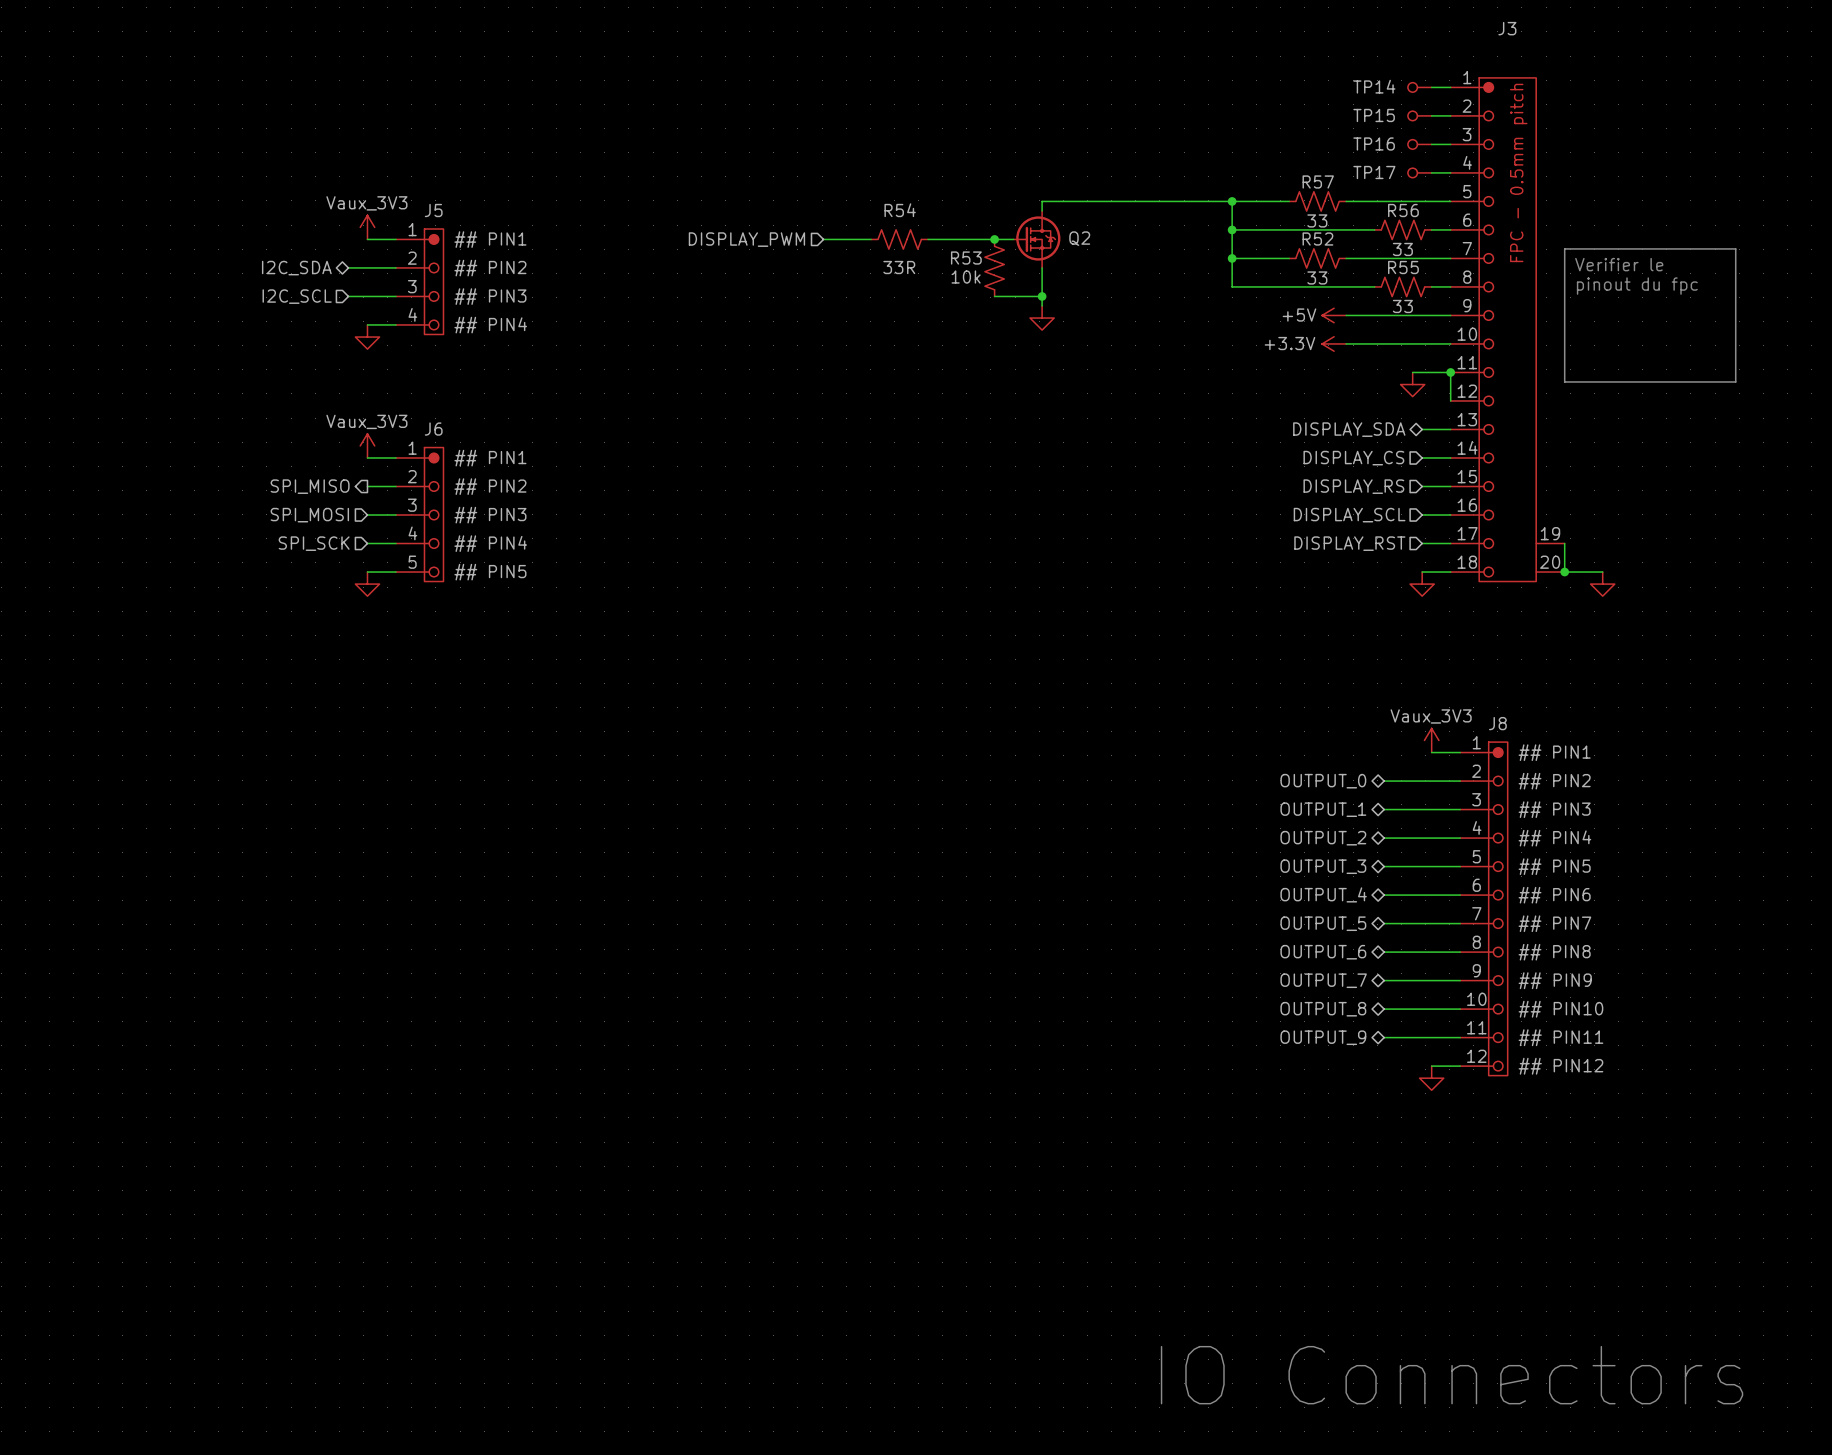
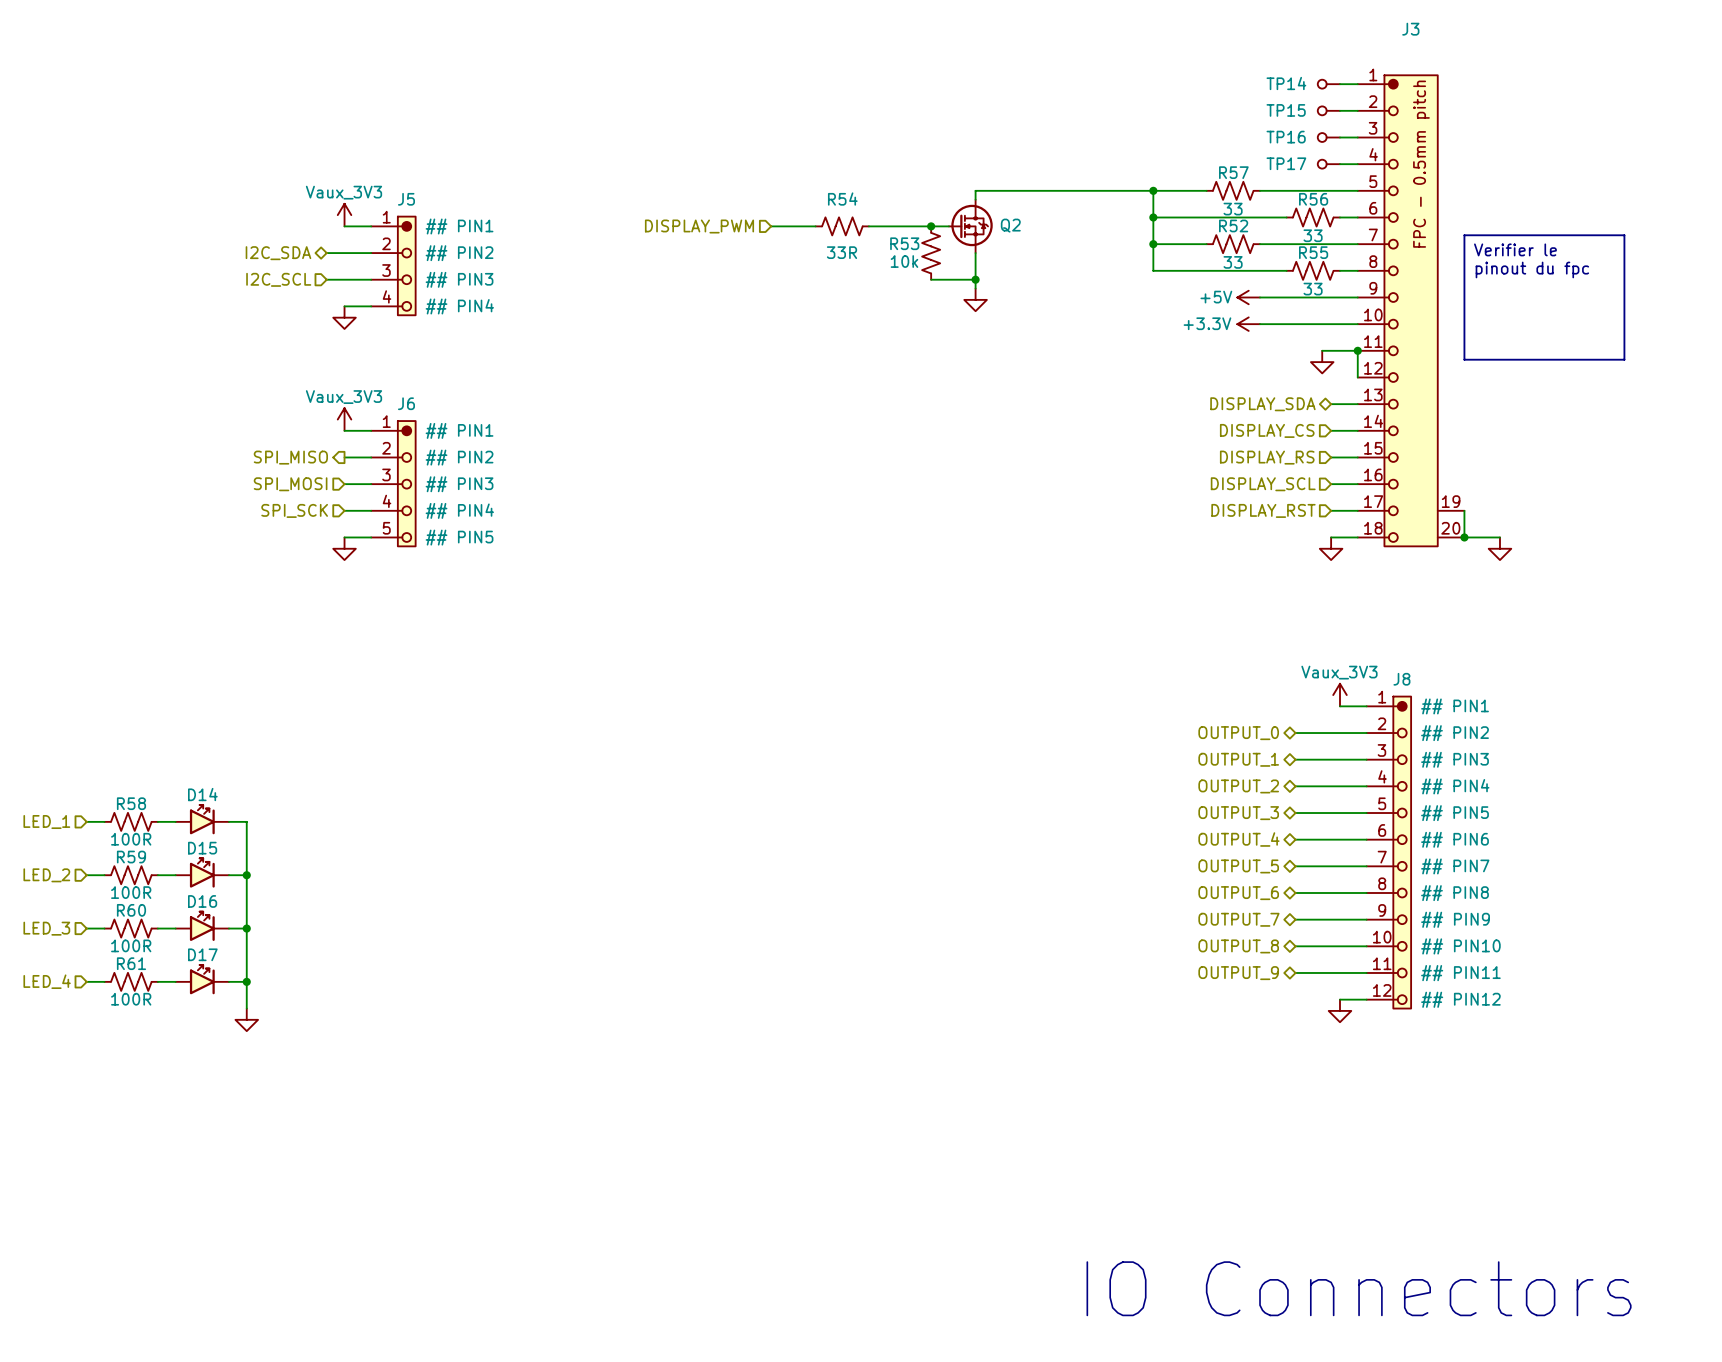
D14: none -> (202, 819)
hierarchical label: none -> LED_1 (46, 822)
wire: none -> (86, 821) (104, 821)
R58: none -> 100R (131, 821)
wire: none -> (157, 821) (175, 821)
wire: none -> (228, 821) (246, 821) (246, 1008)
D15: none -> (202, 872)
hierarchical label: none -> LED_2 (46, 875)
wire: none -> (86, 875) (104, 875)
R59: none -> 100R (131, 875)
wire: none -> (157, 875) (175, 875)
wire: none -> (228, 875) (246, 875)
junction: none -> (246, 875)
D16: none -> (202, 926)
hierarchical label: none -> LED_3 (46, 928)
wire: none -> (86, 928) (104, 928)
R60: none -> 100R (131, 928)
wire: none -> (157, 928) (175, 928)
wire: none -> (228, 928) (246, 928)
junction: none -> (246, 928)
D17: none -> (202, 979)
hierarchical label: none -> LED_4 (47, 981)
wire: none -> (86, 981) (104, 981)
R61: none -> 100R (131, 981)
wire: none -> (157, 981) (175, 981)
wire: none -> (228, 981) (246, 981)
junction: none -> (246, 981)
power symbol: none -> (246, 1019)

